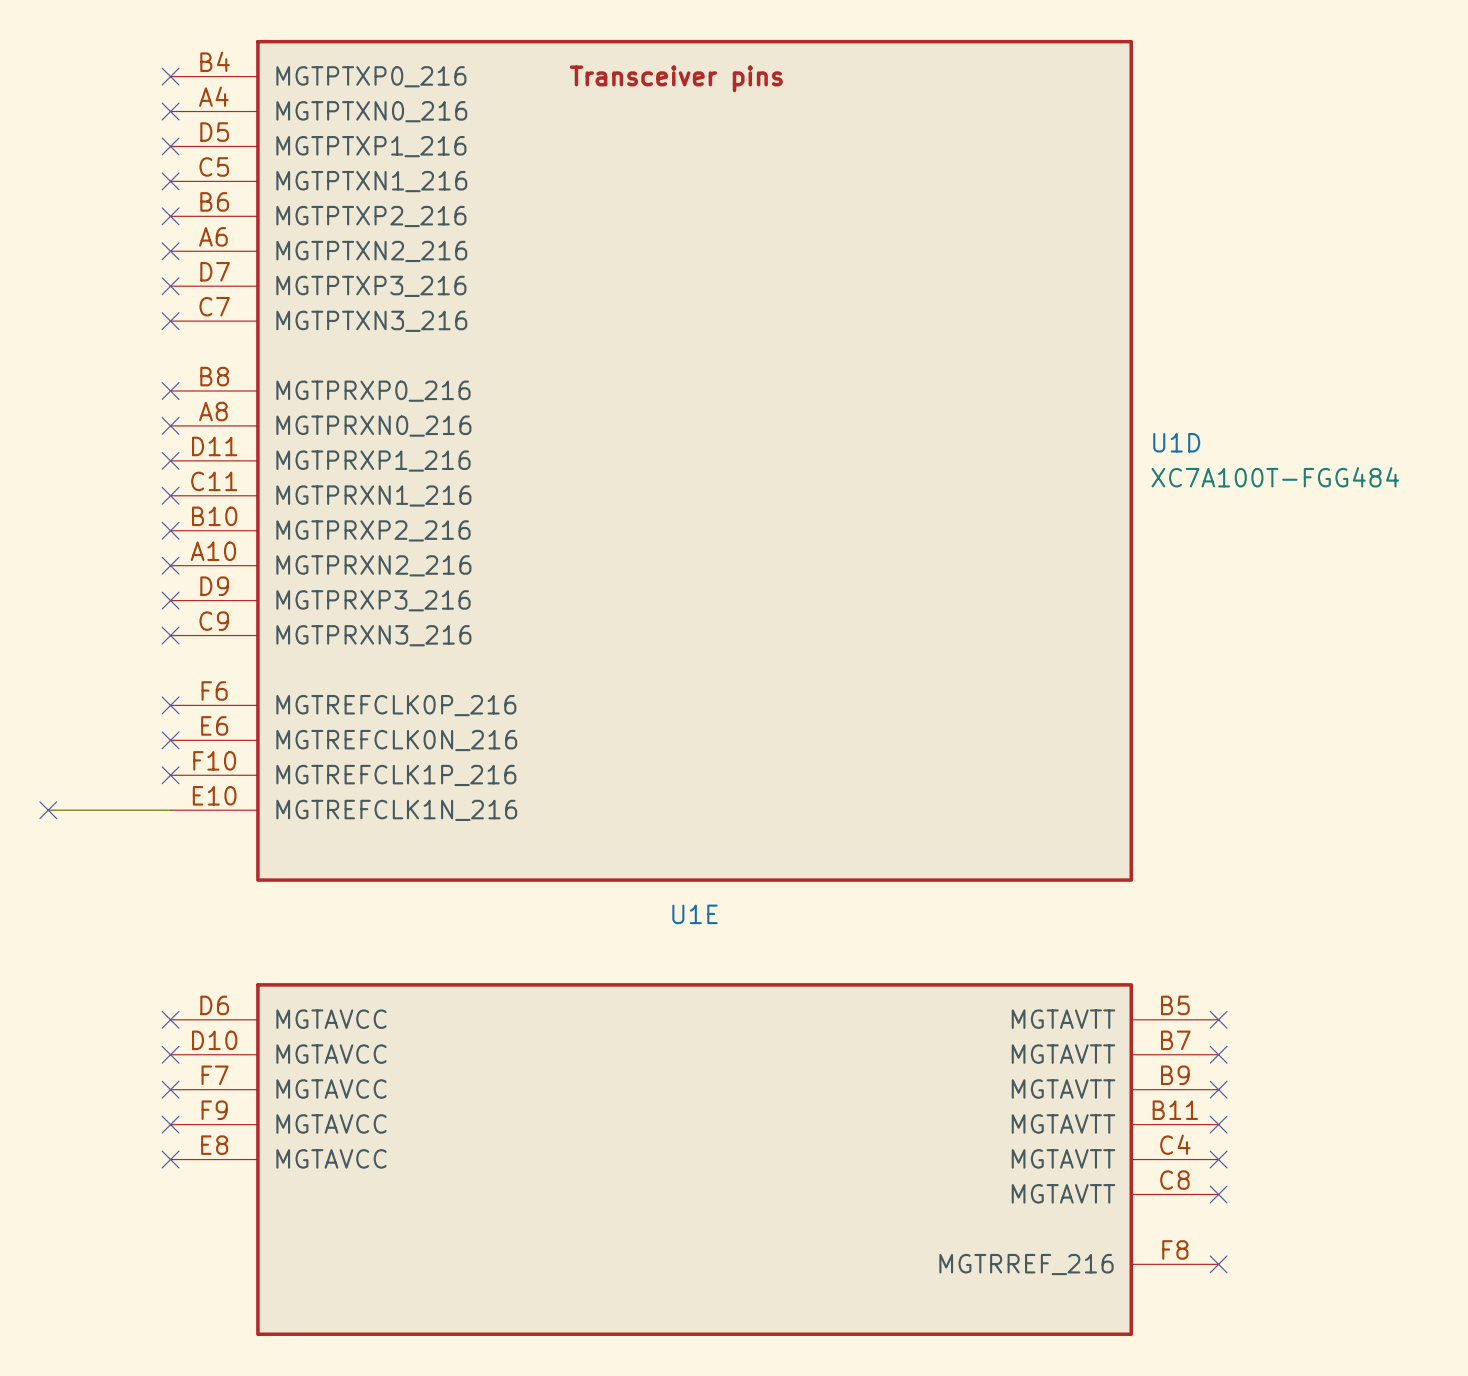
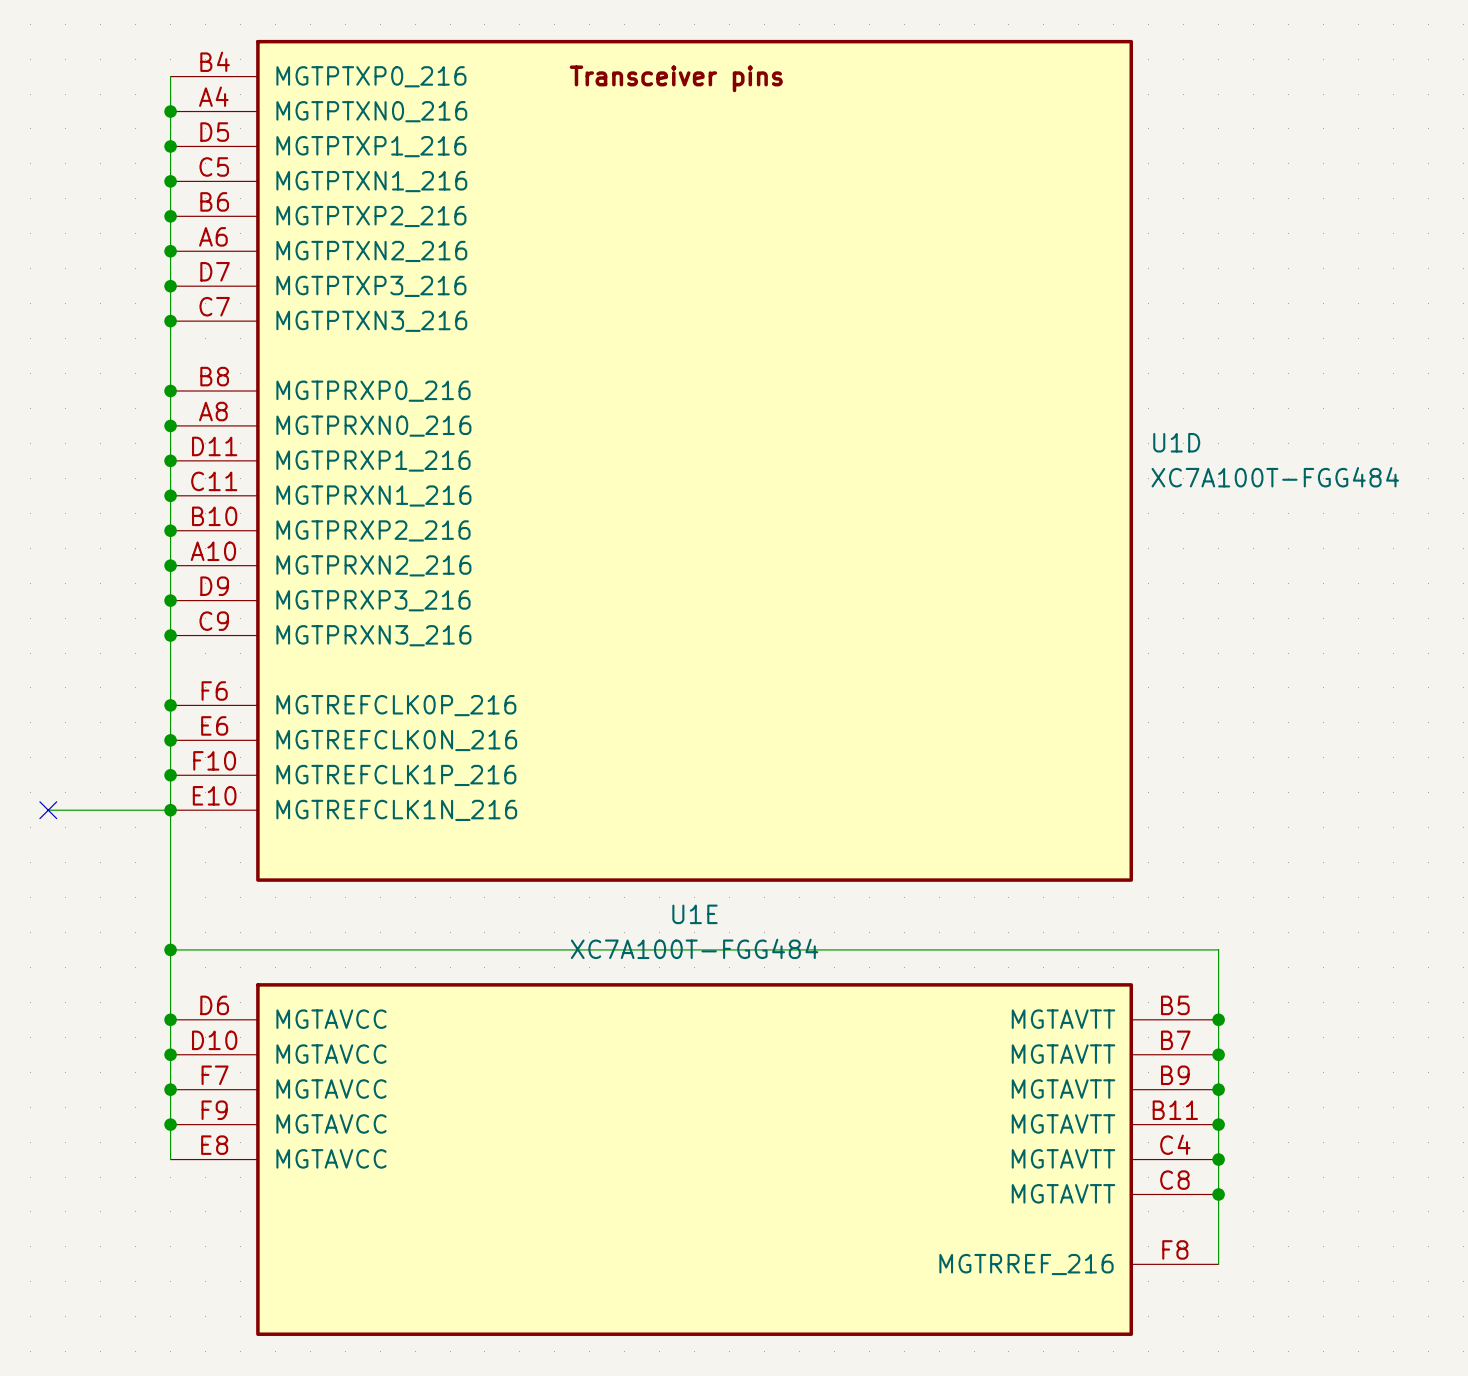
wire: none -> (170, 76) (170, 1159)
no-connect mark: (170, 76) -> none
no-connect mark: (170, 111) -> none
junction: none -> (170, 111)
no-connect mark: (170, 146) -> none
junction: none -> (170, 146)
no-connect mark: (170, 181) -> none
junction: none -> (170, 181)
no-connect mark: (170, 216) -> none
junction: none -> (170, 216)
no-connect mark: (170, 251) -> none
junction: none -> (170, 251)
no-connect mark: (170, 286) -> none
junction: none -> (170, 286)
no-connect mark: (170, 321) -> none
junction: none -> (170, 321)
no-connect mark: (170, 391) -> none
junction: none -> (170, 391)
no-connect mark: (170, 425) -> none
junction: none -> (170, 425)
no-connect mark: (170, 460) -> none
junction: none -> (170, 460)
no-connect mark: (170, 495) -> none
junction: none -> (170, 495)
no-connect mark: (170, 530) -> none
junction: none -> (170, 530)
no-connect mark: (170, 565) -> none
junction: none -> (170, 565)
no-connect mark: (170, 600) -> none
junction: none -> (170, 600)
no-connect mark: (170, 635) -> none
junction: none -> (170, 635)
no-connect mark: (170, 705) -> none
junction: none -> (170, 705)
no-connect mark: (170, 740) -> none
junction: none -> (170, 740)
no-connect mark: (170, 775) -> none
junction: none -> (170, 775)
junction: none -> (170, 810)
U1E value: none -> XC7A100T-FGG484 (694, 948)
wire: none -> (170, 949) (1218, 949) (1218, 1264)
junction: none -> (170, 949)
no-connect mark: (170, 1019) -> none
junction: none -> (170, 1019)
no-connect mark: (1218, 1019) -> none
junction: none -> (1218, 1019)
no-connect mark: (170, 1054) -> none
junction: none -> (170, 1054)
no-connect mark: (1218, 1054) -> none
junction: none -> (1218, 1054)
no-connect mark: (170, 1089) -> none
junction: none -> (170, 1089)
no-connect mark: (1218, 1089) -> none
junction: none -> (1218, 1089)
no-connect mark: (170, 1124) -> none
junction: none -> (170, 1124)
no-connect mark: (1218, 1124) -> none
junction: none -> (1218, 1124)
no-connect mark: (170, 1159) -> none
no-connect mark: (1218, 1159) -> none
junction: none -> (1218, 1159)
no-connect mark: (1218, 1194) -> none
junction: none -> (1218, 1194)
no-connect mark: (1218, 1264) -> none

